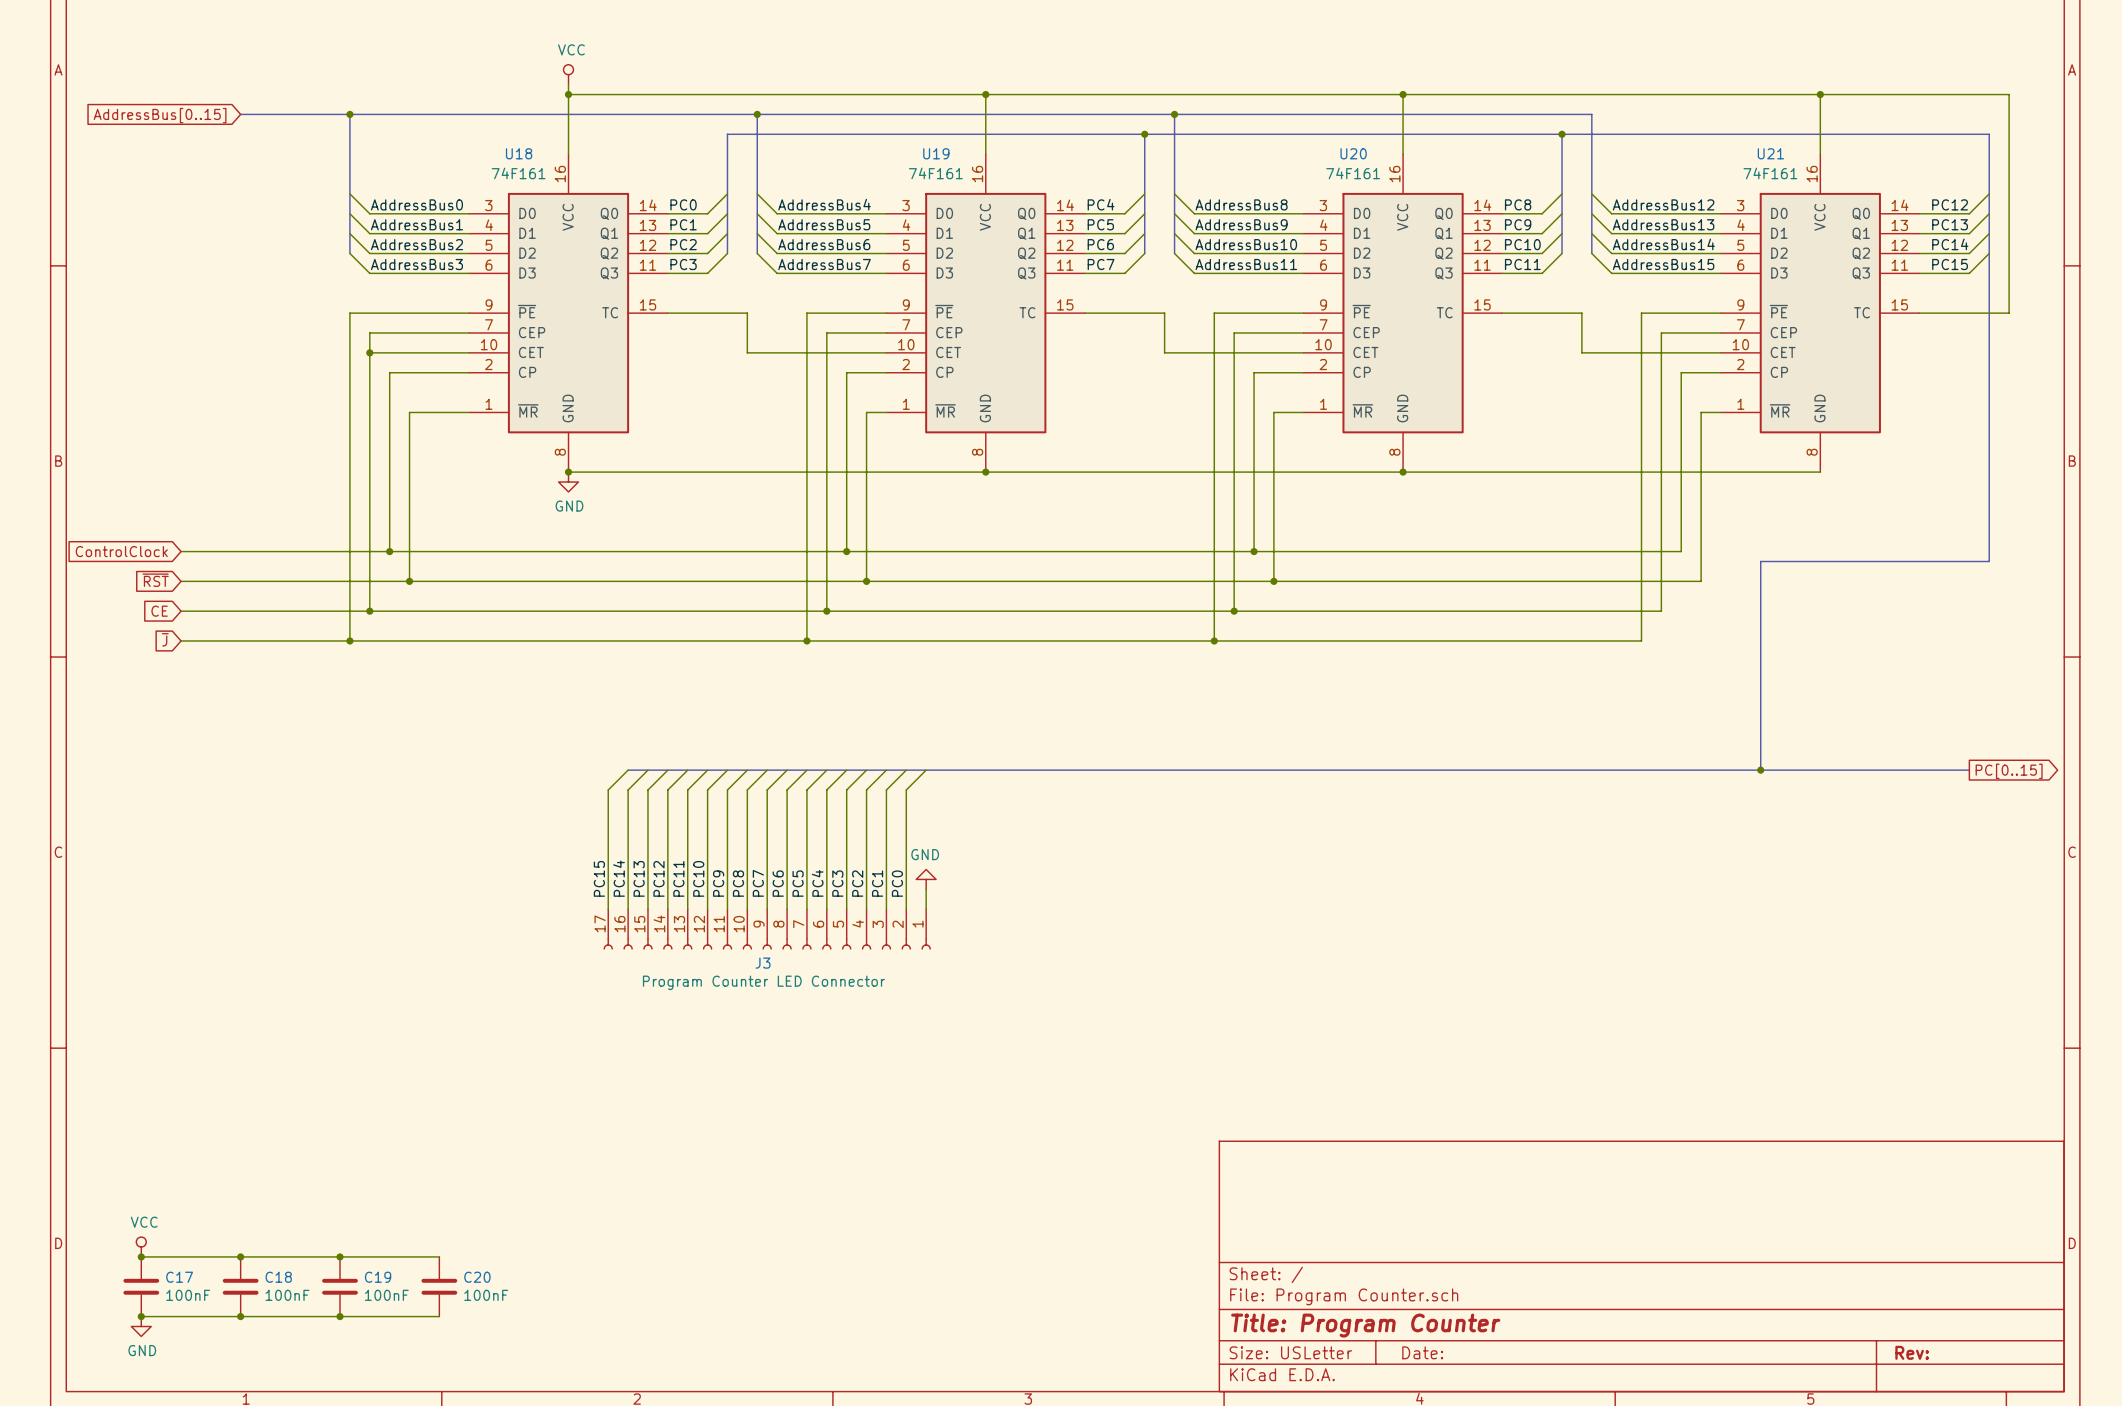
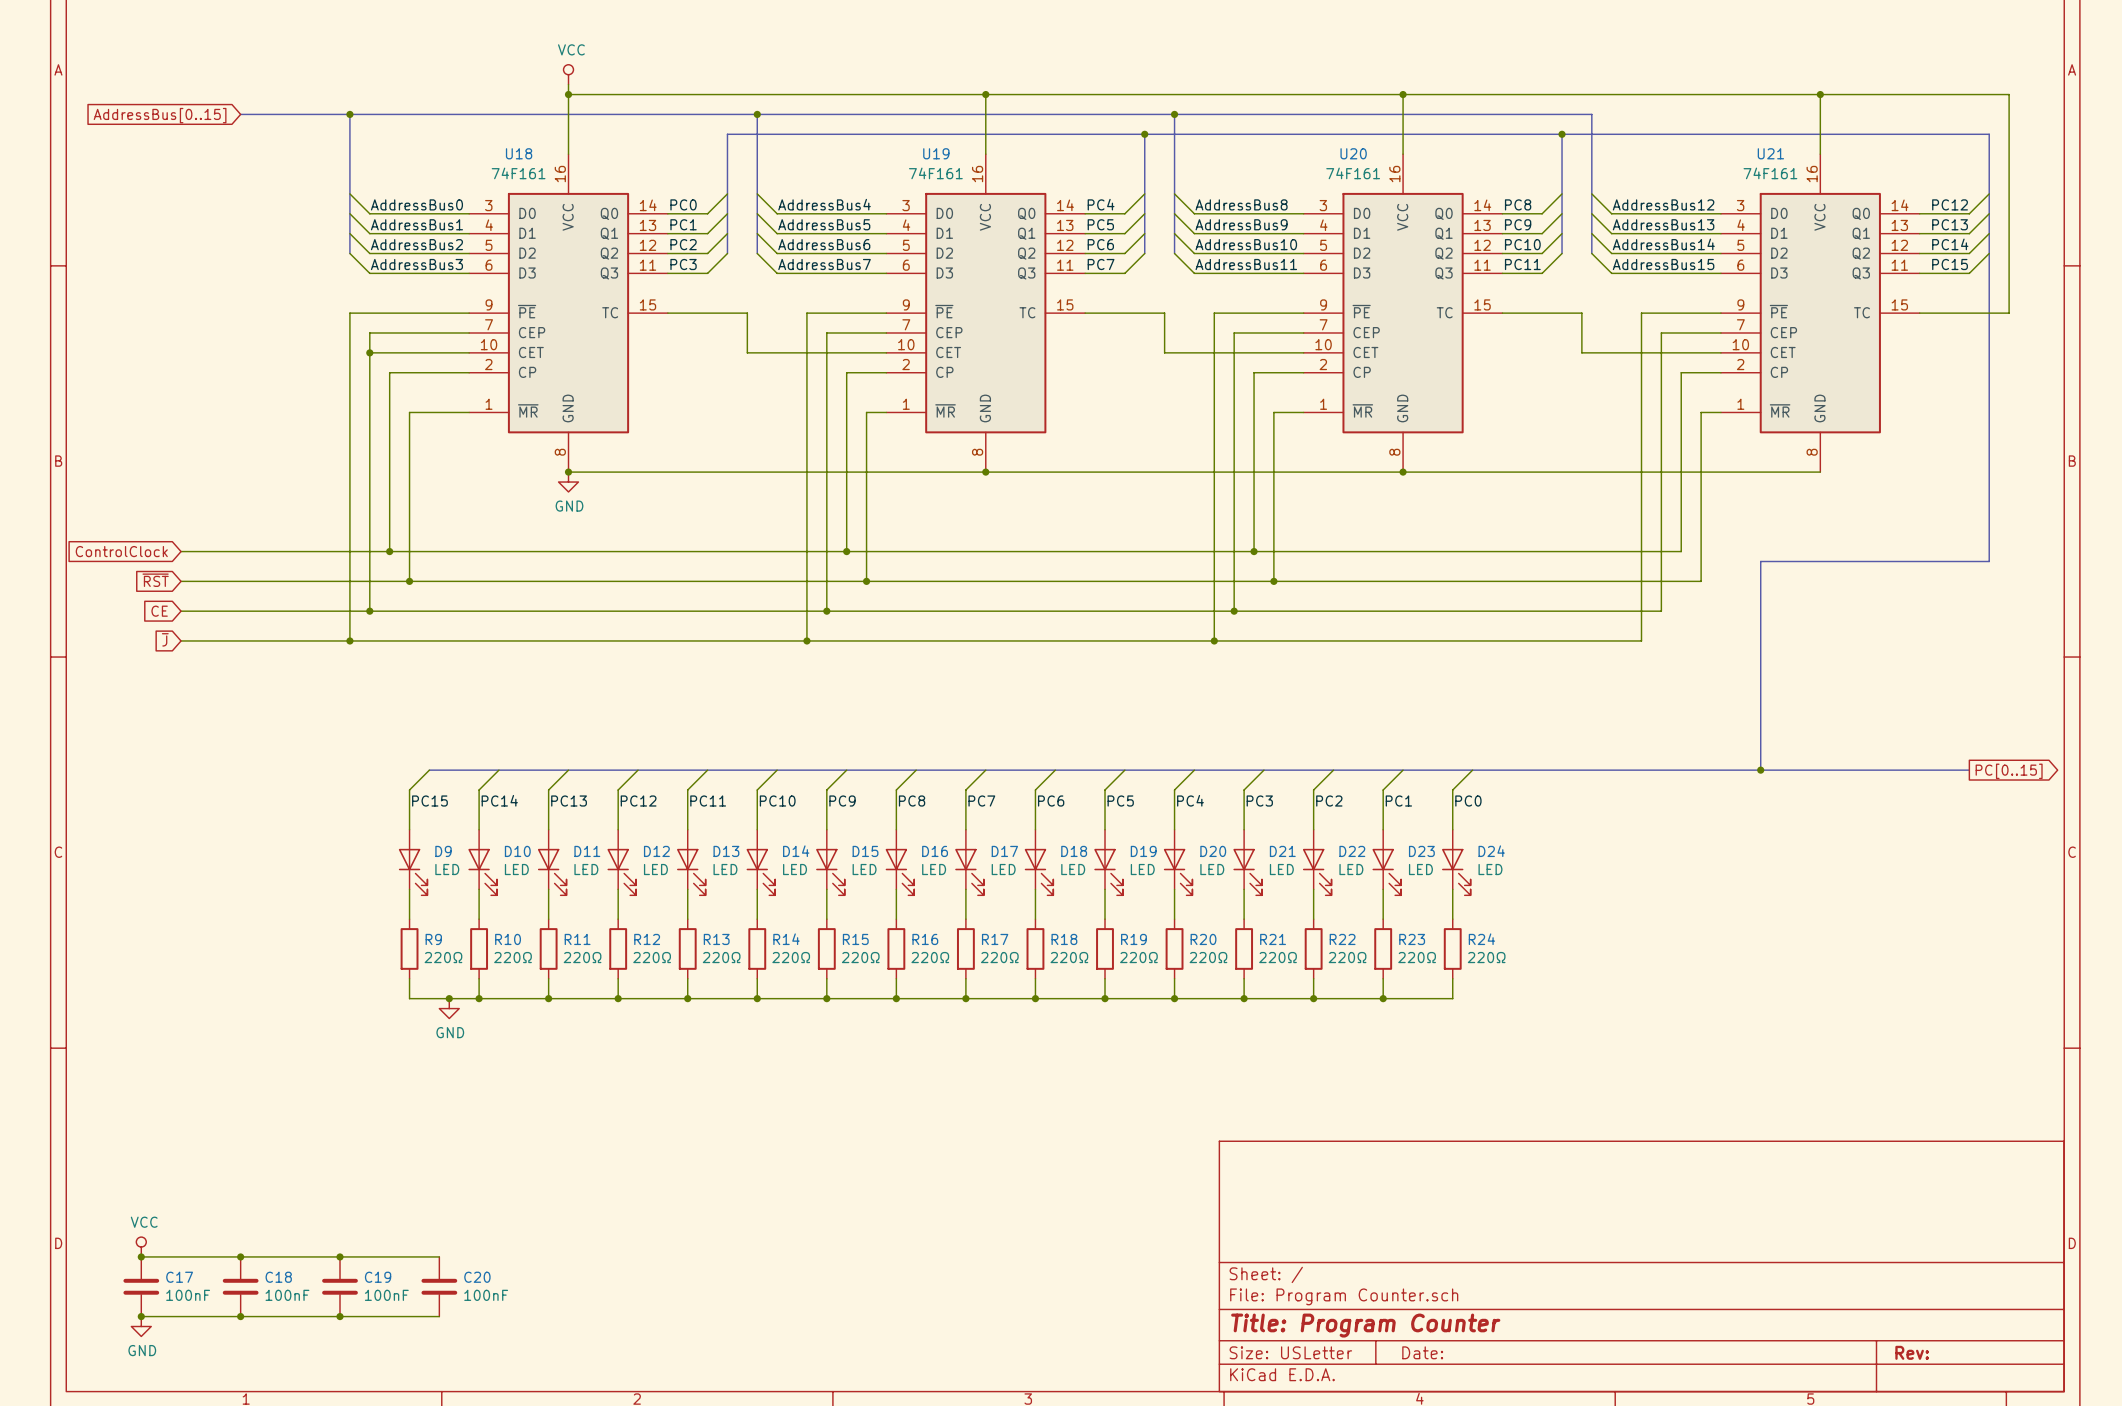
wire: none -> (429, 770) (409, 790) (409, 829)
bus: none -> (429, 770) (628, 770)
wire: none -> (498, 770) (479, 790) (479, 829)
wire: none -> (568, 770) (548, 790) (548, 829)
wire: (628, 770) (608, 790) (608, 909) -> none
wire: none -> (638, 770) (618, 790) (618, 829)
wire: (647, 770) (628, 790) (628, 909) -> none
wire: (667, 770) (647, 790) (647, 909) -> none
wire: (687, 770) (667, 790) (667, 909) -> none
wire: (727, 770) (707, 790) (707, 909) -> none
wire: (747, 770) (727, 790) (727, 909) -> none
wire: (767, 770) (747, 790) (747, 909) -> none
wire: none -> (777, 770) (757, 790) (757, 829)
wire: (787, 770) (767, 790) (767, 909) -> none
wire: (806, 770) (787, 790) (787, 909) -> none
wire: (826, 770) (806, 790) (806, 909) -> none
wire: (866, 770) (846, 790) (846, 909) -> none
wire: (886, 770) (866, 790) (866, 909) -> none
wire: (906, 770) (886, 790) (886, 909) -> none
wire: none -> (916, 770) (896, 790) (896, 829)
wire: (926, 770) (906, 790) (906, 909) -> none
wire: none -> (985, 770) (965, 790) (965, 829)
wire: none -> (1055, 770) (1035, 790) (1035, 829)
wire: none -> (1124, 770) (1105, 790) (1105, 829)
wire: none -> (1194, 770) (1174, 790) (1174, 829)
wire: none -> (1263, 770) (1244, 790) (1244, 829)
wire: none -> (1333, 770) (1313, 790) (1313, 829)
wire: none -> (1403, 770) (1383, 790) (1383, 829)
wire: none -> (1472, 770) (1452, 790) (1452, 829)
label: none -> PC4 (1190, 800)
label: none -> PC15 (429, 801)
label: none -> PC7 (981, 801)
label: none -> PC6 (1051, 801)
label: none -> PC5 (1120, 801)
label: none -> PC3 (1259, 801)
label: none -> PC2 (1329, 801)
label: none -> PC1 (1398, 801)
label: none -> PC0 (1468, 801)
D9: none -> LED (413, 862)
D10: none -> LED (482, 862)
D11: none -> LED (552, 862)
D12: none -> LED (621, 862)
D13: none -> LED (691, 862)
D14: none -> LED (760, 862)
D15: none -> LED (830, 862)
D16: none -> LED (899, 862)
D17: none -> LED (969, 862)
D18: none -> LED (1039, 862)
D19: none -> LED (1108, 862)
D20: none -> LED (1178, 862)
D21: none -> LED (1247, 862)
D22: none -> LED (1317, 862)
D23: none -> LED (1386, 862)
D24: none -> LED (1456, 862)
label: PC15 (599, 878) -> none
label rotation: 0° (619, 878) -> 90° clockwise (499, 800)
label position: PC14 (619, 878) -> PC14 (499, 800)
label rotation: 0° (639, 878) -> 90° clockwise (569, 801)
label position: PC13 (639, 878) -> PC13 (569, 801)
label rotation: 0° (658, 878) -> 90° clockwise (638, 801)
label position: PC12 (658, 878) -> PC12 (638, 801)
label rotation: 0° (678, 878) -> 90° clockwise (708, 801)
label position: PC11 (678, 878) -> PC11 (708, 801)
label rotation: 0° (698, 878) -> 90° clockwise (777, 801)
label position: PC10 (698, 878) -> PC10 (777, 801)
power symbol: GND (926, 879) -> none
label rotation: 0° (718, 883) -> 90° clockwise (842, 801)
label position: PC9 (718, 883) -> PC9 (842, 801)
label rotation: 0° (738, 883) -> 90° clockwise (912, 801)
label position: PC8 (738, 883) -> PC8 (912, 801)
label: PC7 (758, 883) -> none
label: PC6 (778, 883) -> none
label: PC5 (798, 883) -> none
label: PC4 (817, 883) -> none
label: PC3 (837, 883) -> none
label: PC2 (857, 883) -> none
label: PC1 (877, 883) -> none
label: PC0 (897, 883) -> none
wire: none -> (409, 889) (409, 919)
wire: none -> (479, 889) (479, 919)
wire: none -> (548, 889) (548, 919)
wire: none -> (618, 889) (618, 919)
wire: none -> (757, 889) (757, 919)
wire: none -> (896, 889) (896, 919)
wire: (926, 889) (926, 909) -> (896, 978) (896, 998)
wire: none -> (965, 889) (965, 919)
wire: none -> (1035, 889) (1035, 919)
wire: none -> (1105, 889) (1105, 919)
wire: none -> (1174, 889) (1174, 919)
wire: none -> (1244, 889) (1244, 919)
wire: none -> (1313, 889) (1313, 919)
wire: none -> (1383, 889) (1383, 919)
wire: none -> (1452, 889) (1452, 919)
J3: Program Counter LED Connector (767, 929) -> none
R9: none -> 220Ω (409, 948)
R10: none -> 220Ω (479, 948)
R11: none -> 220Ω (548, 948)
R12: none -> 220Ω (618, 948)
R13: none -> 220Ω (687, 948)
R14: none -> 220Ω (757, 948)
R15: none -> 220Ω (826, 948)
R16: none -> 220Ω (896, 948)
R17: none -> 220Ω (965, 948)
R18: none -> 220Ω (1035, 948)
R19: none -> 220Ω (1105, 948)
R20: none -> 220Ω (1174, 948)
R21: none -> 220Ω (1244, 948)
R22: none -> 220Ω (1313, 948)
R23: none -> 220Ω (1383, 948)
R24: none -> 220Ω (1452, 948)
wire: none -> (409, 978) (409, 998) (1452, 998) (1452, 978)
wire: none -> (479, 978) (479, 998)
wire: none -> (548, 978) (548, 998)
wire: none -> (618, 978) (618, 998)
wire: none -> (687, 978) (687, 998)
wire: none -> (757, 978) (757, 998)
wire: none -> (826, 978) (826, 998)
wire: none -> (965, 978) (965, 998)
wire: none -> (1035, 978) (1035, 998)
wire: none -> (1105, 978) (1105, 998)
wire: none -> (1174, 978) (1174, 998)
wire: none -> (1244, 978) (1244, 998)
wire: none -> (1313, 978) (1313, 998)
wire: none -> (1383, 978) (1383, 998)
junction: none -> (449, 998)
junction: none -> (479, 998)
junction: none -> (548, 998)
junction: none -> (618, 998)
junction: none -> (687, 998)
junction: none -> (757, 998)
junction: none -> (826, 998)
junction: none -> (896, 998)
junction: none -> (965, 998)
junction: none -> (1035, 998)
junction: none -> (1105, 998)
junction: none -> (1174, 998)
junction: none -> (1244, 998)
junction: none -> (1313, 998)
junction: none -> (1383, 998)
power symbol: none -> GND (449, 1008)

